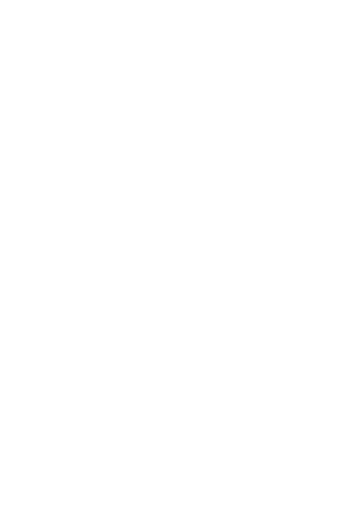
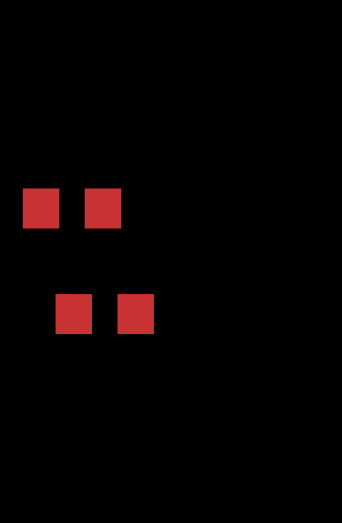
part: none -> (71, 208)
part: none -> (104, 314)

